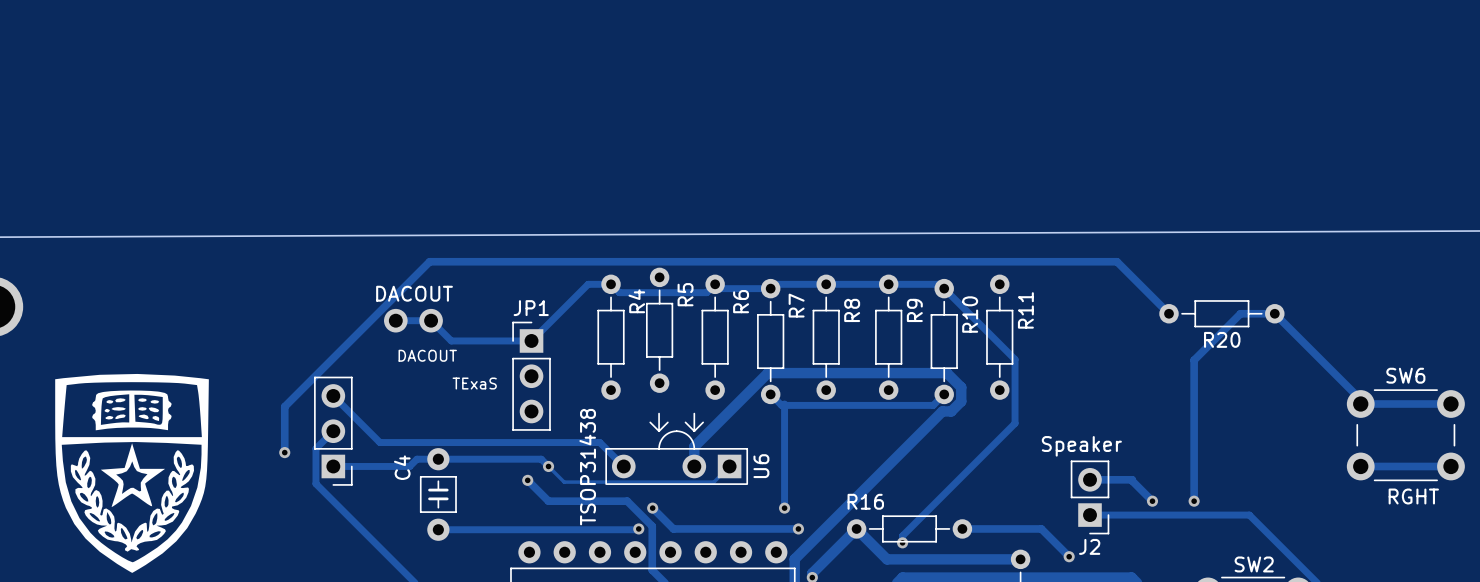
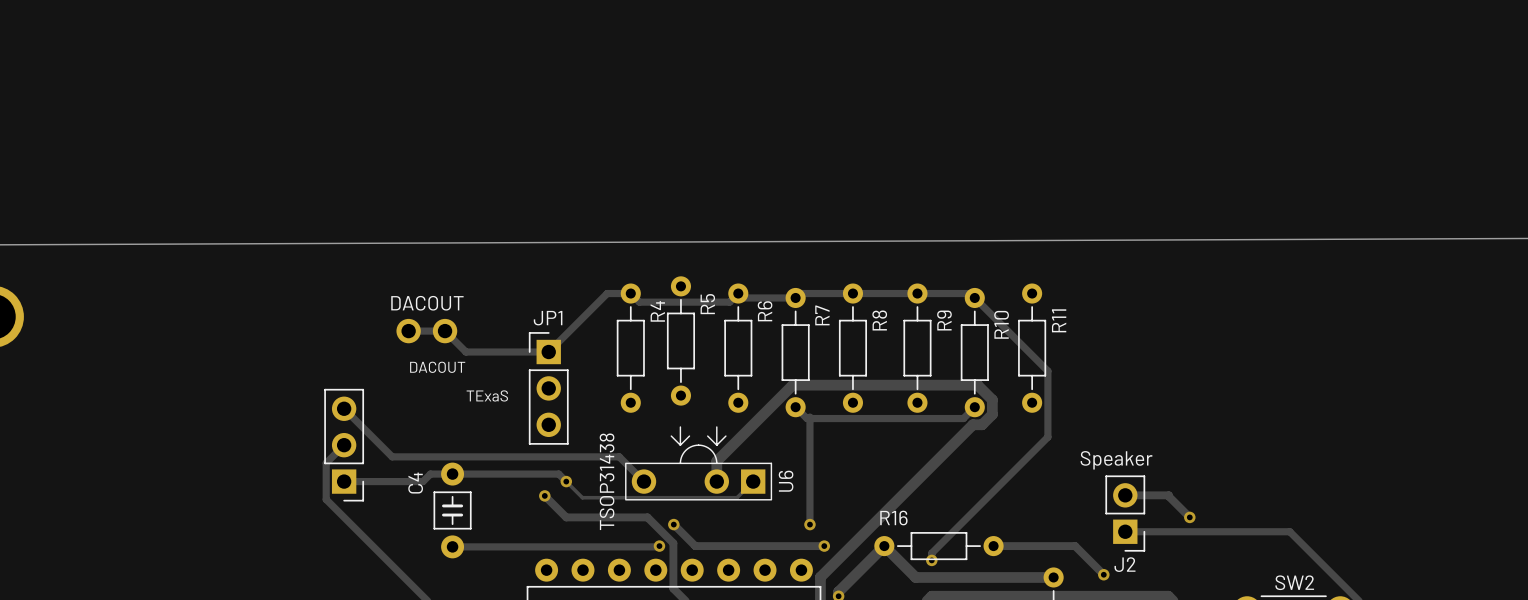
track: (1169, 313) (1116, 261) (429, 261) (284, 406) (284, 452) -> none
R20: (1221, 313) -> none
drawing: [55, 373, 209, 573] -> none
track: (1450, 404) (1360, 404) (1360, 399) (1274, 313) (1240, 313) (1194, 360) (1194, 501) -> none
SW6: RGHT (1405, 435) -> none
via: (284, 452) -> none
track: (1360, 466) (1450, 466) -> none
via: (1194, 501) -> none

